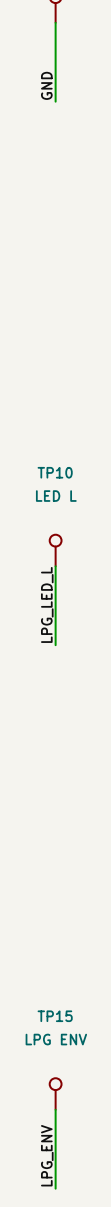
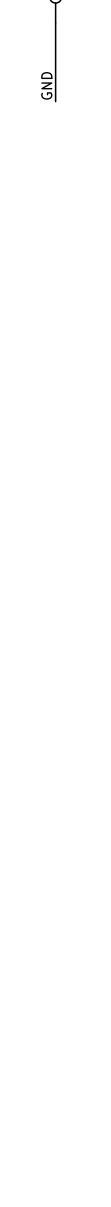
TP10: LED L (55, 550) -> none
wire: (55, 566) (55, 645) -> none
label: LPG_LED_L (47, 604) -> none
TP15: LPG ENV (55, 1094) -> none
wire: (55, 1109) (55, 1188) -> none
label: LPG_ENV (47, 1155) -> none

